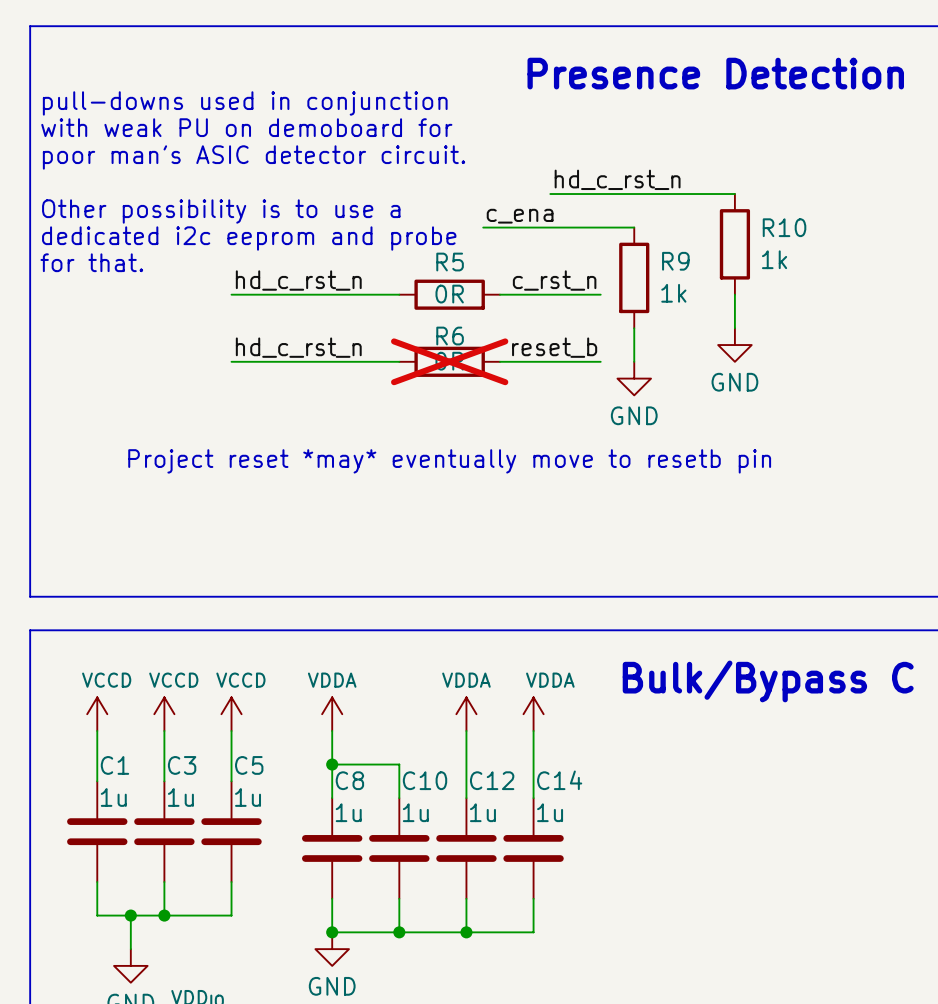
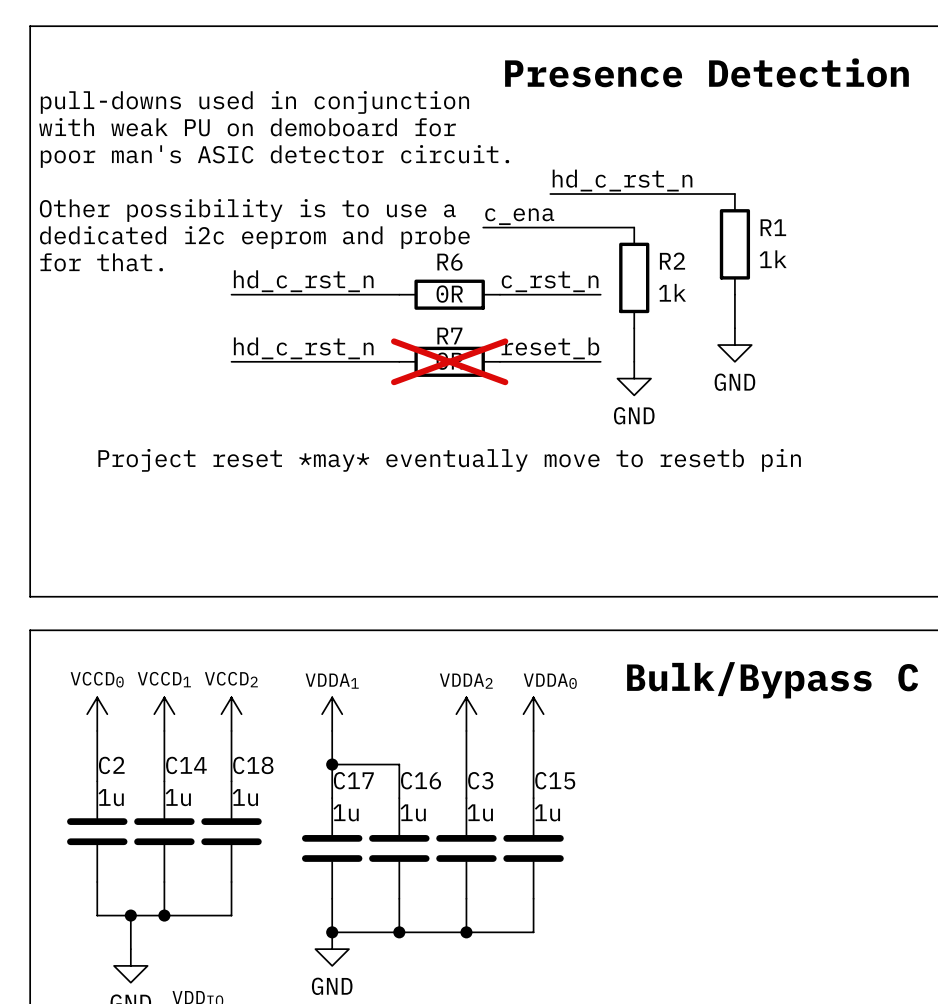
R10 name: R10 (784, 227) -> R1 (773, 227)
R9 name: R9 (675, 261) -> R2 (672, 261)
R5 name: R5 (450, 262) -> R6 (449, 262)
R6 name: R6 (450, 336) -> R7 (449, 336)
power symbol: VCCD (97, 714) -> VCCD0 (97, 714)
power symbol: VCCD (164, 714) -> VCCD1 (164, 714)
power symbol: VCCD (231, 714) -> VCCD2 (231, 714)
power symbol: VDDA (332, 714) -> VDDA1 (332, 714)
power symbol: VDDA (466, 714) -> VDDA2 (466, 714)
power symbol: VDDA (533, 714) -> VDDA0 (533, 714)
C1 name: C1 (114, 765) -> C2 (111, 765)
C3 name: C3 (182, 765) -> C14 (186, 765)
C5 name: C5 (249, 765) -> C18 (253, 765)
C8 name: C8 (349, 780) -> C17 (353, 780)
C10 name: C10 (425, 780) -> C16 (421, 780)
C12 name: C12 (492, 780) -> C3 (480, 780)
C14 name: C14 (559, 780) -> C15 (555, 780)

